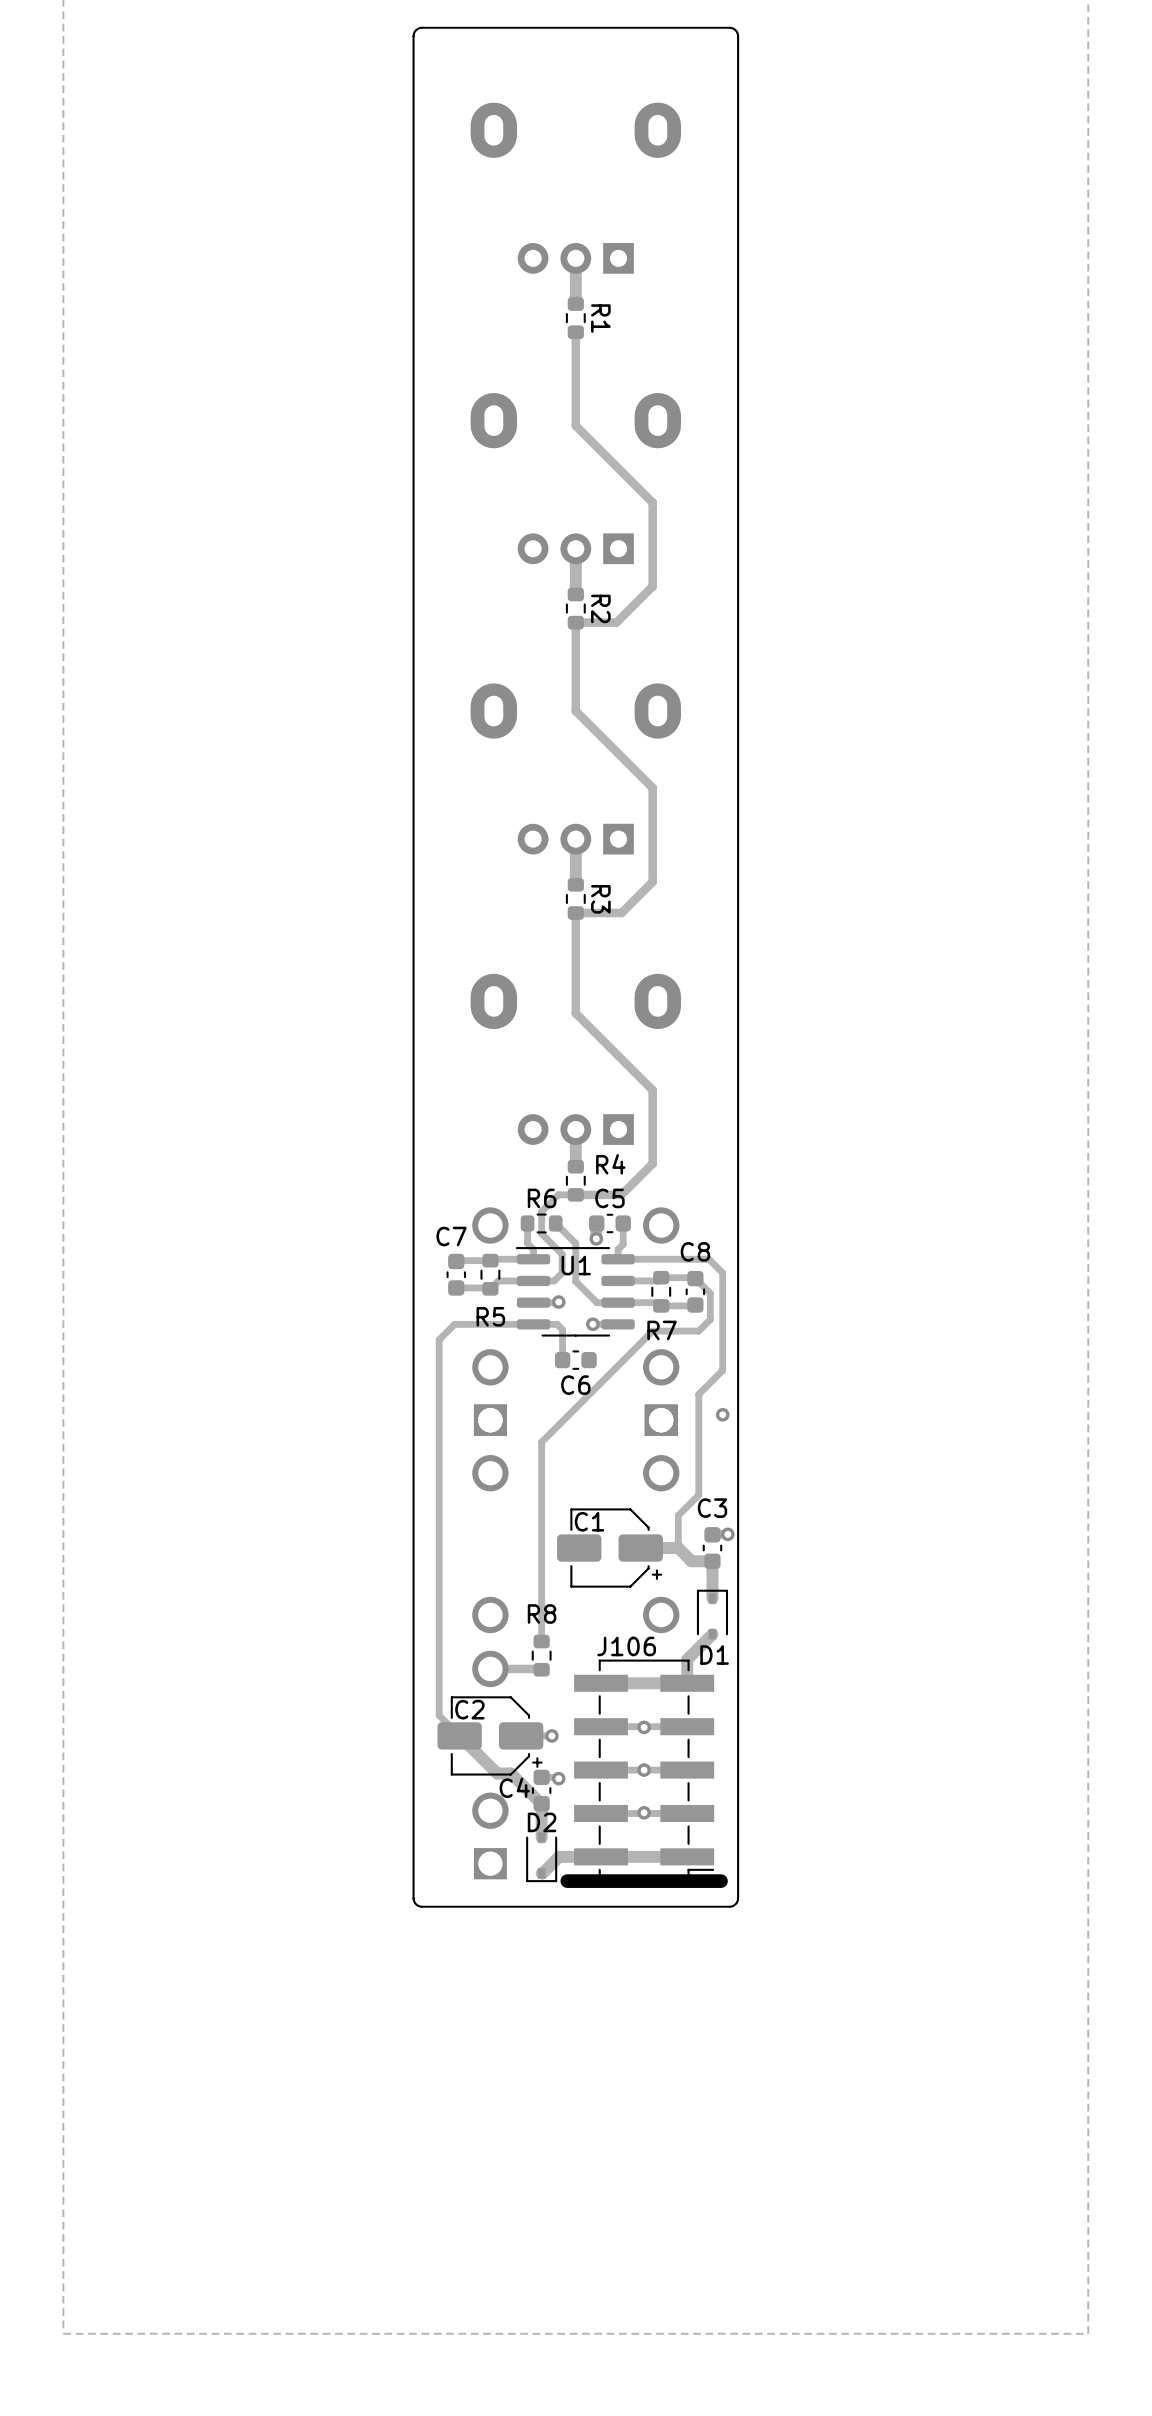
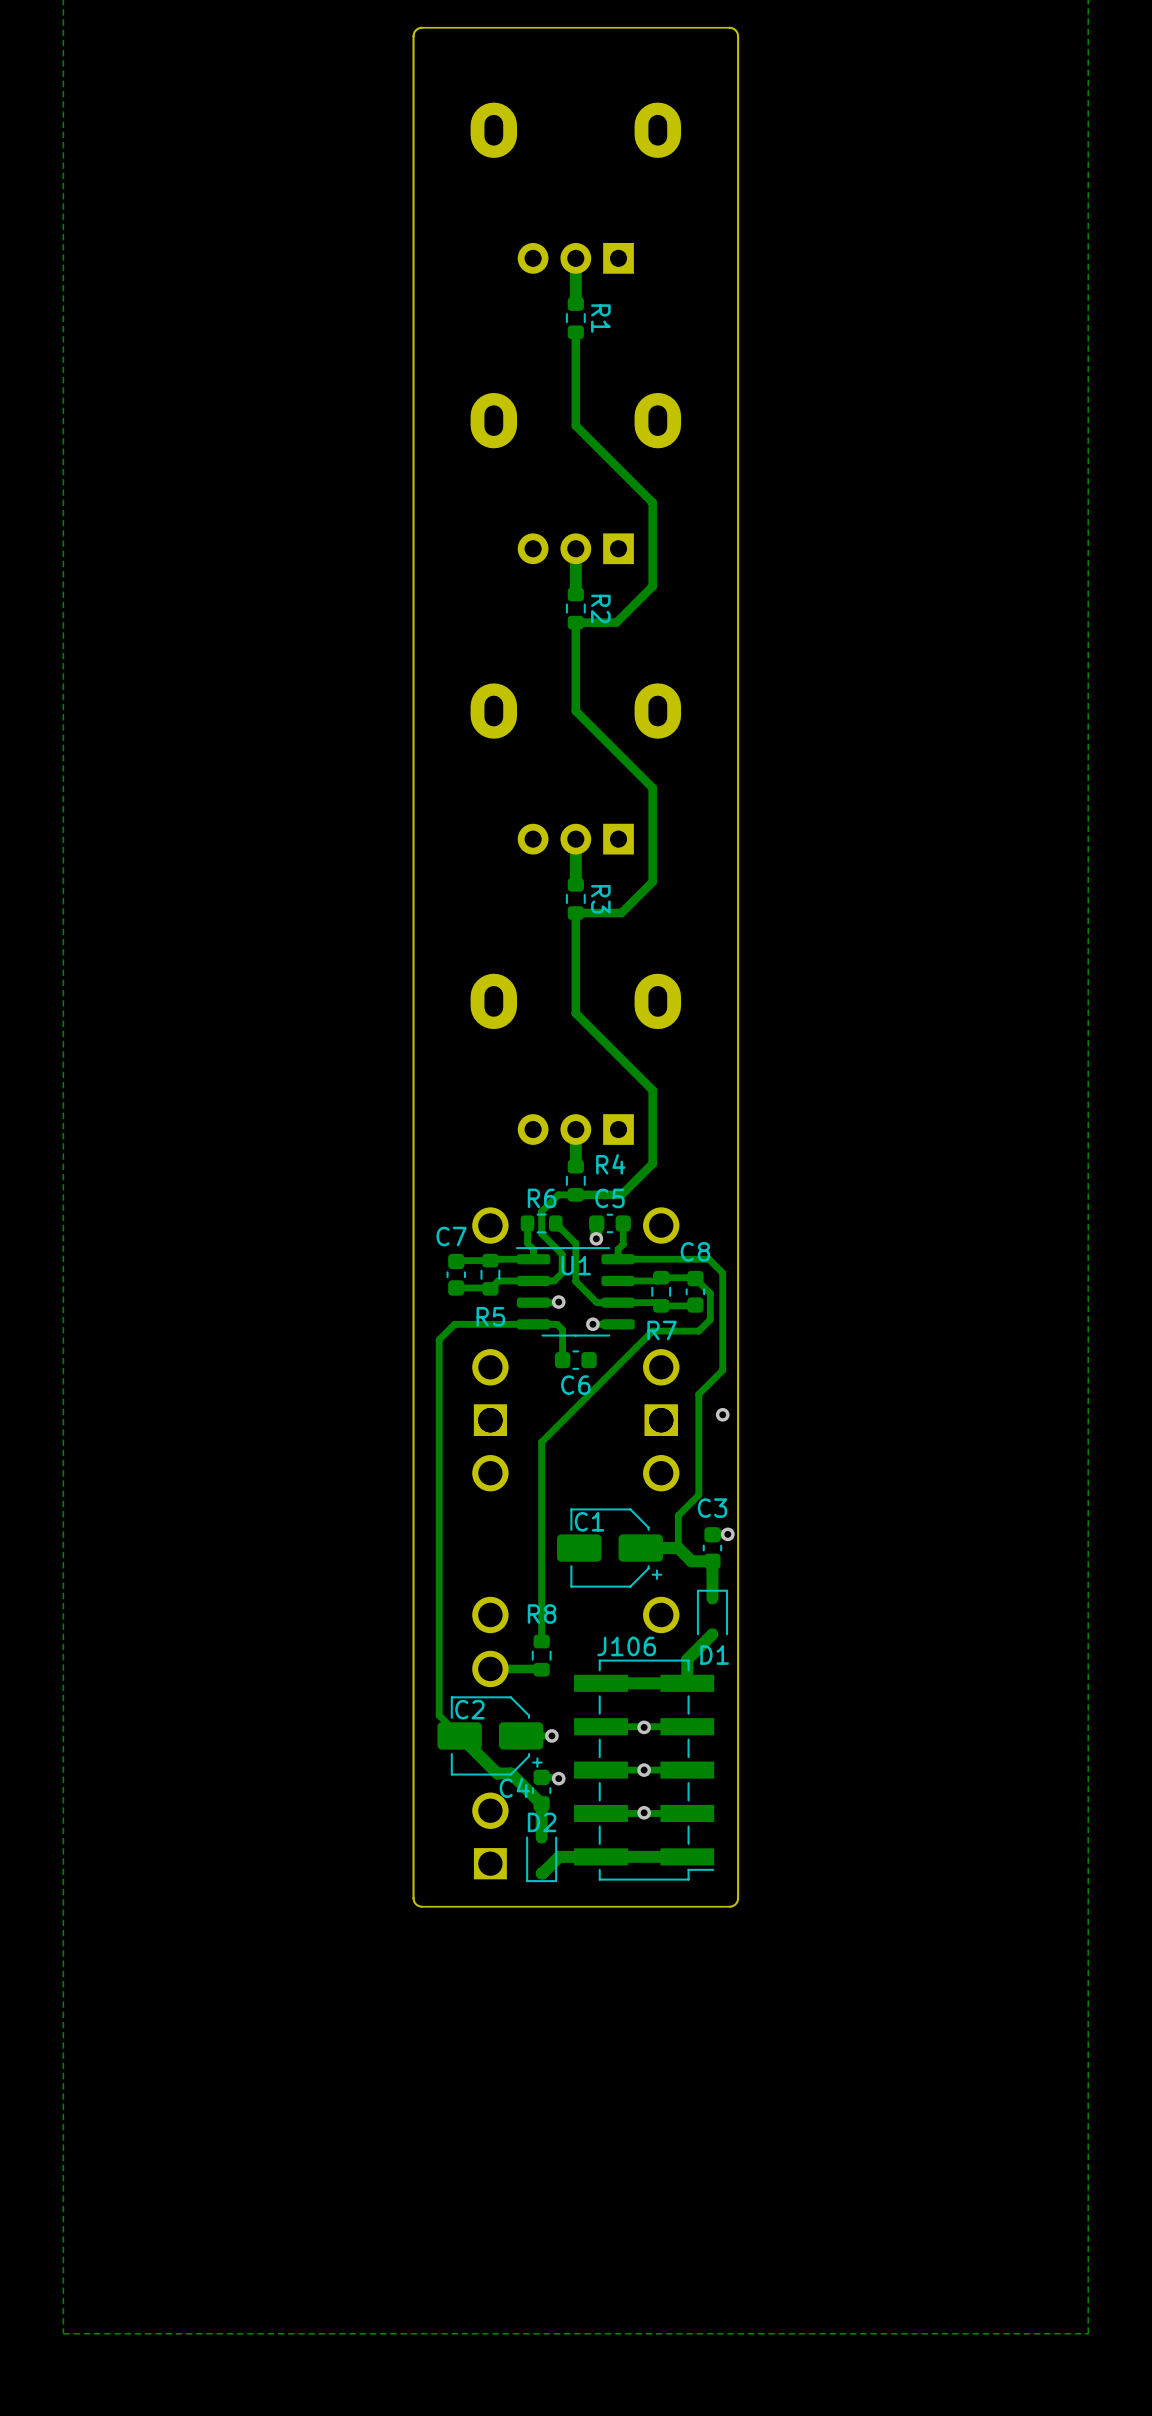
line: (721, 1881) (567, 1881) -> none

